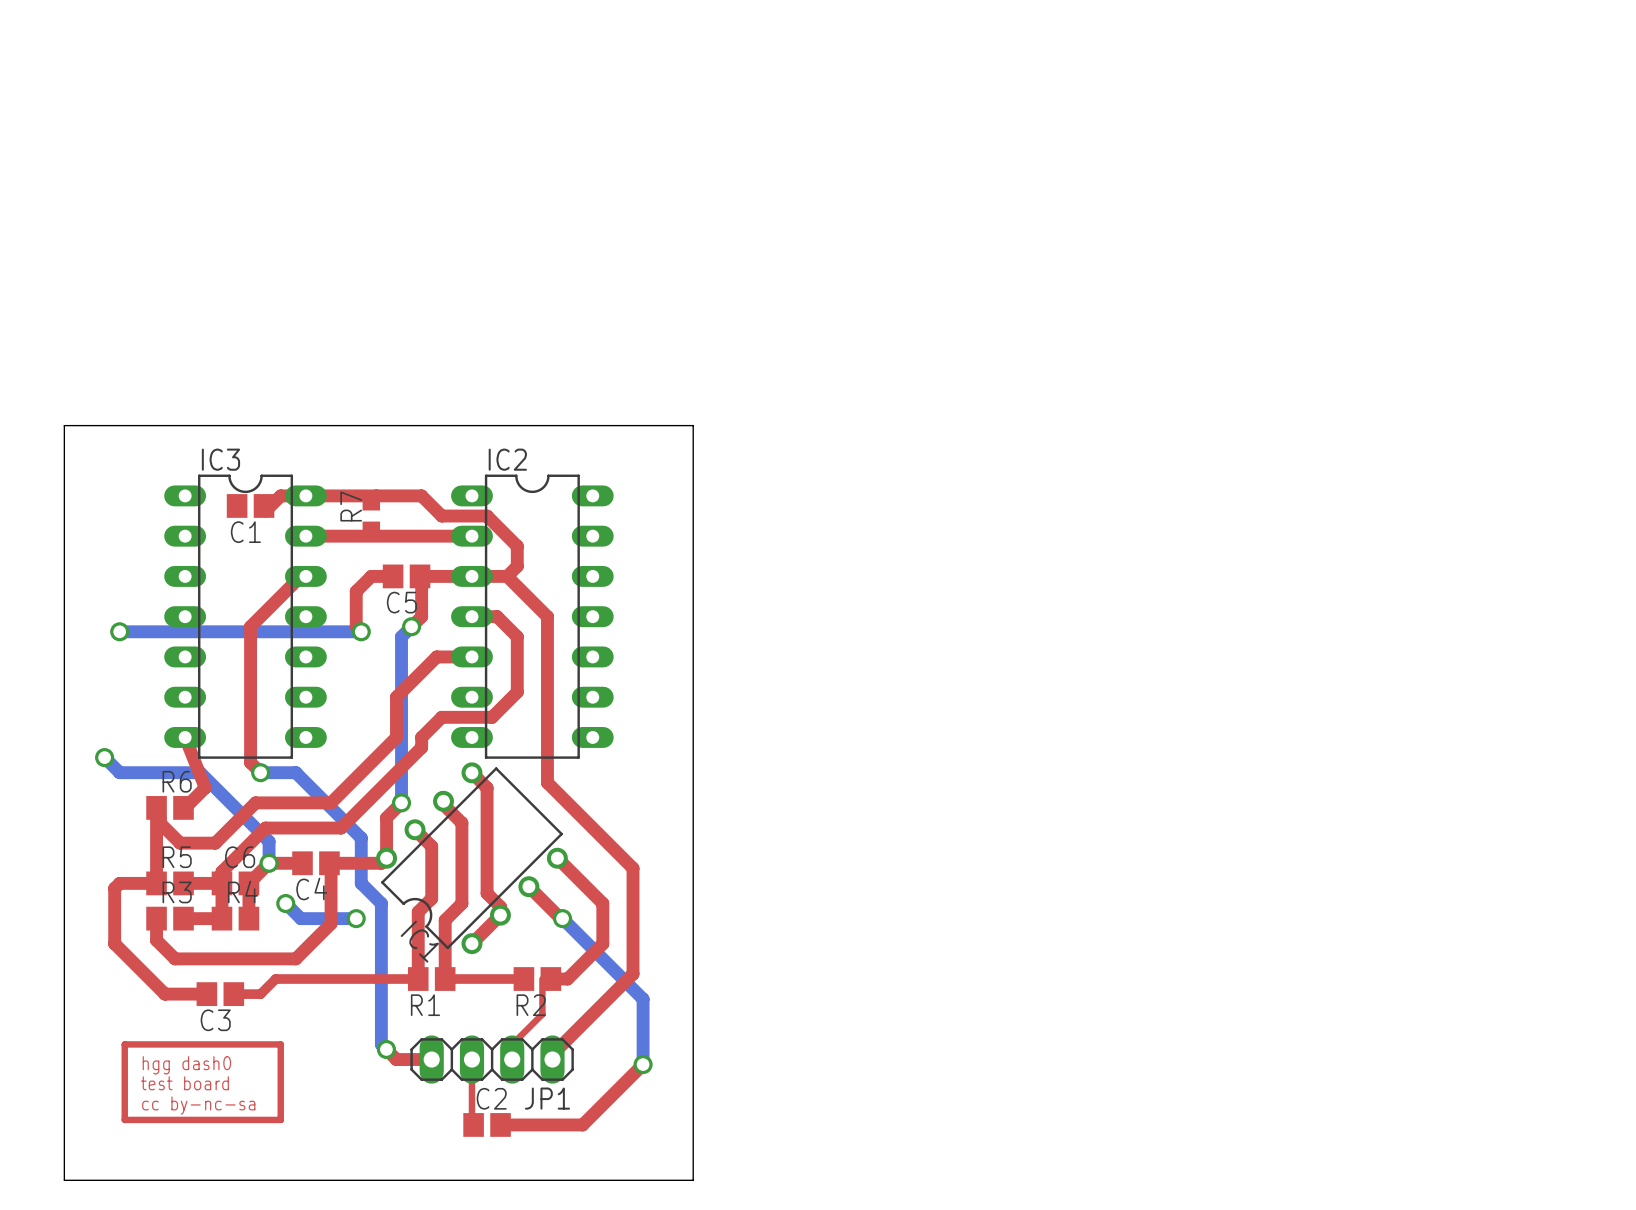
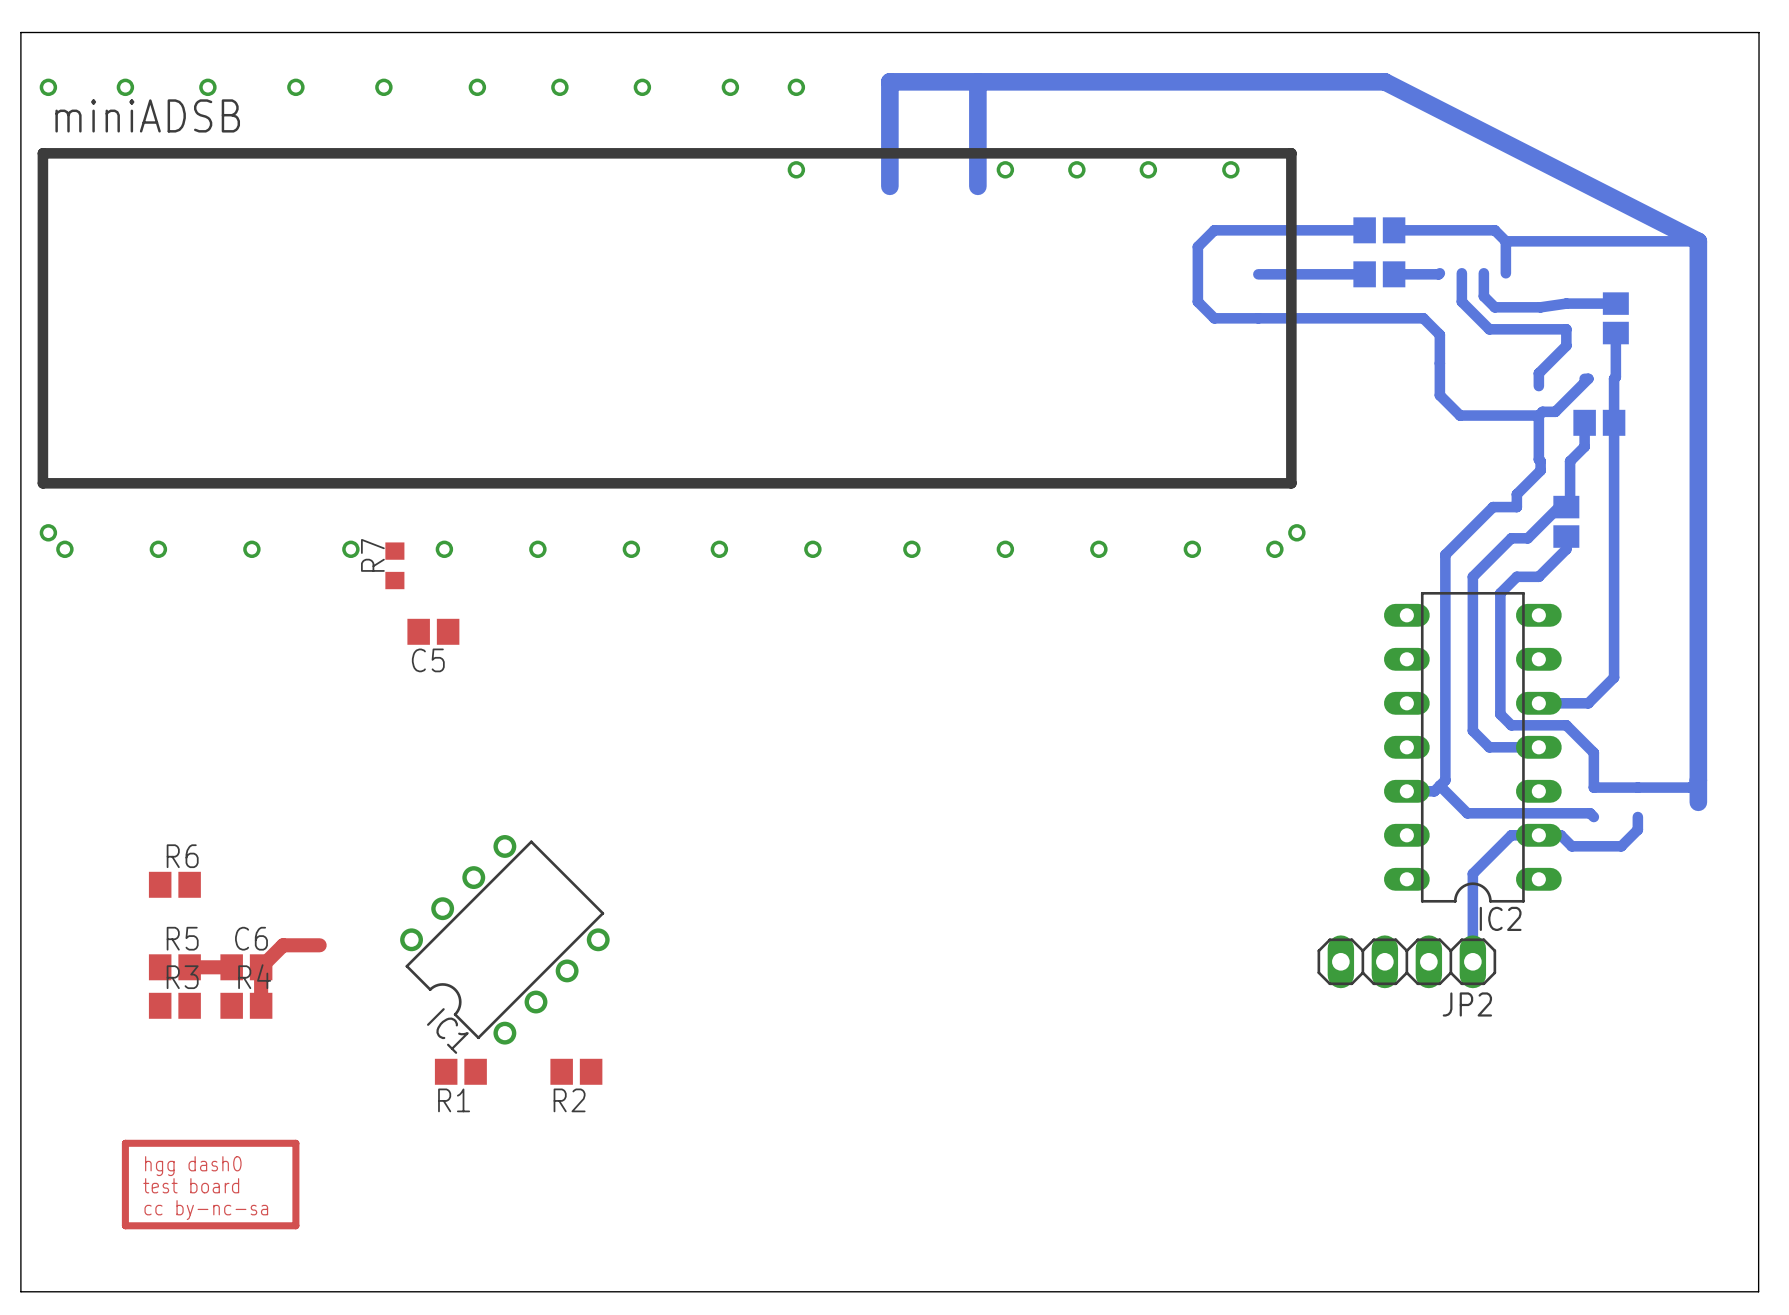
bottom track: none -> (977, 81) (977, 186)
via: none -> (48, 87)
via: none -> (125, 87)
via: none -> (207, 87)
via: none -> (295, 87)
via: none -> (383, 87)
via: none -> (477, 87)
via: none -> (559, 87)
via: none -> (642, 87)
via: none -> (730, 87)
via: none -> (796, 87)
text: none -> miniADSB (147, 115)
line: none -> (42, 153) (1291, 153) (1291, 483) (42, 483) (42, 153)
via: none -> (796, 169)
via: none -> (1005, 169)
via: none -> (1076, 169)
via: none -> (1148, 169)
via: none -> (1230, 169)
bottom track: none -> (889, 186) (889, 81) (1384, 81) (1698, 241)
bottom track: none -> (1364, 230) (1214, 230) (1197, 246) (1197, 301) (1214, 318) (1423, 318) (1439, 334) (1439, 395) (1460, 415) (1538, 415)
part: none -> (1379, 230)
bottom track: none -> (1394, 230) (1494, 230) (1505, 241)
bottom track: none -> (1505, 241) (1505, 273)
bottom track: none -> (1505, 241) (1698, 241)
bottom track: none -> (1698, 241) (1698, 802)
bottom track: none -> (1439, 273) (1394, 274)
bottom track: none -> (1461, 273) (1461, 301) (1489, 329) (1566, 329) (1566, 345) (1538, 373) (1538, 386)
bottom track: none -> (1483, 273) (1483, 296) (1494, 307) (1540, 307) (1566, 303) (1615, 303)
bottom track: none -> (1258, 274) (1364, 274)
part: none -> (1379, 274)
part: none -> (1615, 318)
bottom track: none -> (1615, 333) (1615, 377) (1614, 378) (1614, 677) (1588, 703) (1538, 703)
bottom track: none -> (1584, 378) (1588, 378) (1555, 411) (1542, 411) (1538, 415)
bottom track: none -> (1538, 415) (1540, 470) (1516, 494) (1516, 507) (1493, 507) (1445, 554) (1445, 780) (1434, 791) (1406, 791)
bottom track: none -> (1584, 422) (1584, 446) (1570, 461) (1570, 503) (1566, 507) (1559, 507) (1527, 538) (1511, 538) (1472, 576) (1472, 730) (1489, 747) (1538, 747)
part: none -> (1599, 422)
part: none -> (1566, 521)
via: none -> (48, 532)
via: none -> (1296, 532)
bottom track: none -> (1566, 536) (1566, 549) (1538, 576) (1516, 576) (1500, 593) (1500, 714) (1511, 725) (1566, 725) (1593, 752) (1593, 787) (1691, 787) (1698, 780)
via: none -> (64, 549)
via: none -> (158, 549)
via: none -> (251, 549)
via: none -> (350, 549)
via: none -> (444, 549)
via: none -> (537, 549)
via: none -> (631, 549)
via: none -> (719, 549)
via: none -> (812, 549)
via: none -> (911, 549)
via: none -> (1005, 549)
via: none -> (1098, 549)
via: none -> (1192, 549)
via: none -> (1274, 549)
C1: (250, 505) -> none
top track: (264, 505) (265, 511) (280, 495) (421, 495) (441, 516) (487, 516) (517, 546) (517, 566) (507, 576) -> none
top track: (371, 529) (371, 536) (305, 536) (471, 536) -> none
top track: (305, 576) (300, 576) (250, 626) (250, 762) (260, 772) -> none
top track: (393, 576) (371, 576) (356, 591) (356, 626) (361, 631) -> none
top track: (507, 576) (420, 576) (421, 578) (421, 616) (411, 626) -> none
top track: (507, 576) (547, 616) (547, 782) (633, 868) (633, 973) (552, 1054) (552, 1059) -> none
IC3: (245, 616) -> none
top track: (471, 616) (497, 616) (517, 636) (517, 692) (492, 717) (441, 717) (421, 737) (421, 747) (341, 828) (265, 828) (221, 871) (221, 918) (183, 918) -> none
IC2 rotation: 0° (532, 616) -> 180° (1472, 747)
IC2 position: (532, 616) -> (1472, 747)
bottom track: (411, 626) (401, 636) (401, 802) -> none
via: (411, 626) -> none
bottom track: (119, 631) (361, 631) -> none
via: (119, 631) -> none
via: (361, 631) -> none
top track: (471, 656) (436, 656) (396, 697) (396, 737) (331, 802) (255, 802) (215, 843) (180, 843) (159, 823) (159, 817) (154, 812) -> none
bottom track: none -> (1439, 785) (1467, 813) (1590, 813) (1593, 817)
top track: (185, 737) (205, 787) (183, 807) -> none
bottom track: none -> (1637, 817) (1637, 829) (1621, 846) (1571, 846) (1560, 835) (1511, 835) (1472, 873) (1472, 961)
bottom track: (104, 757) (119, 772) (200, 772) (269, 841) (269, 863) -> none
via: (104, 757) -> none
bottom track: (260, 772) (295, 772) (361, 838) (361, 883) (381, 903) (381, 1044) (386, 1049) -> none
via: (260, 772) -> none
top track: (471, 772) (487, 787) (487, 893) (500, 906) (500, 915) (471, 943) -> none
top track: (441, 797) (441, 802) (461, 823) (461, 903) (445, 920) (445, 979) (523, 979) -> none
top track: (401, 802) (386, 817) (386, 858) (381, 863) (329, 863) (331, 864) (331, 923) (295, 958) (175, 958) (156, 940) (156, 918) -> none
via: (401, 802) -> none
top track: (156, 807) (156, 883) (119, 883) (114, 888) (114, 943) (165, 994) (206, 994) -> none
top track: (415, 829) (431, 846) (431, 898) (418, 911) (418, 979) (275, 979) (260, 994) (233, 994) -> none
top track: (557, 858) (602, 903) (602, 943) (567, 979) (547, 979) -> none
via: (269, 863) -> none
C4: (315, 863) -> none
JP2: none -> (1406, 961)
top track: (528, 886) (562, 918) -> none
bottom track: (285, 903) (300, 918) (356, 918) -> none
via: (285, 903) -> none
via: (356, 918) -> none
bottom track: (562, 918) (643, 999) (643, 1064) -> none
via: (562, 918) -> none
top track: (542, 979) (542, 1014) (512, 1044) (512, 1059) -> none
C3: (220, 994) -> none
top track: (386, 1049) (396, 1059) (431, 1059) -> none
via: (386, 1049) -> none
top track: (471, 1059) (471, 1123) (473, 1124) -> none
JP1: (492, 1059) -> none
top track: (643, 1064) (582, 1124) (500, 1124) -> none
via: (643, 1064) -> none
C2: (487, 1124) -> none
board edge: (64, 1180) (64, 425) (693, 425) (693, 1180) -> (59, 1291) (20, 1291) (20, 32) (1759, 32) (1758, 1291) (746, 1291)

